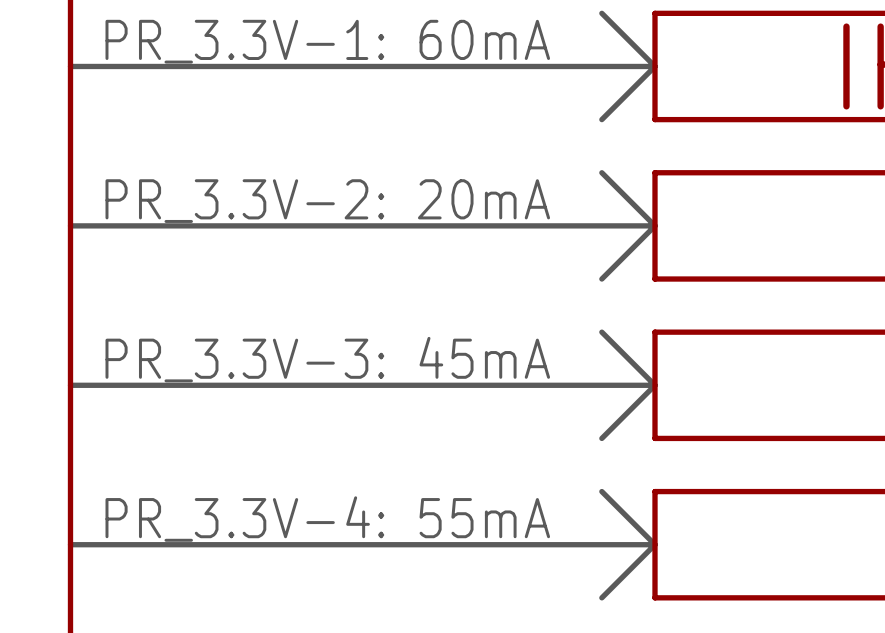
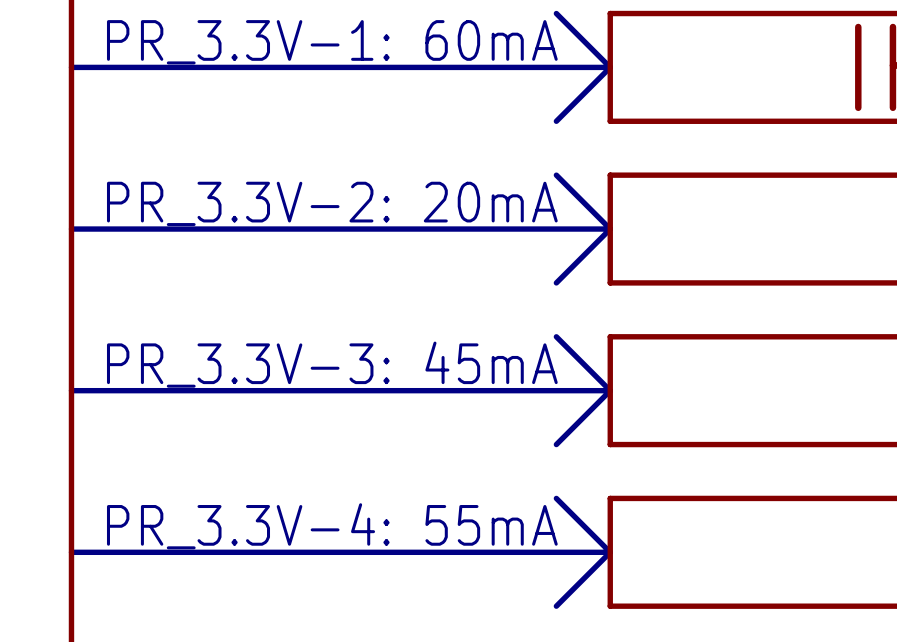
line: none -> (556, 13) (610, 67) (556, 121)
line: (601, 13) (654, 66) -> none
line: (654, 13) (654, 119) -> (664, 13) (610, 13) (610, 121) (664, 121)
line: (601, 66) (654, 66) -> none
line: (654, 66) (601, 119) -> none
line: none -> (556, 175) (610, 229) (556, 282)
line: (601, 172) (654, 225) -> none
line: (654, 172) (654, 279) -> (664, 175) (610, 175) (610, 282) (664, 282)
line: (601, 225) (654, 225) -> none
line: (654, 225) (601, 279) -> none
line: none -> (556, 336) (610, 390) (556, 444)
line: (601, 332) (654, 385) -> none
line: (654, 332) (654, 438) -> (664, 336) (610, 336) (610, 444) (664, 444)
line: (601, 385) (654, 385) -> none
line: (654, 385) (601, 438) -> none
line: none -> (556, 498) (610, 552) (556, 606)
line: (601, 491) (654, 544) -> none
line: (654, 491) (654, 597) -> (664, 498) (610, 498) (610, 606) (664, 606)
line: (601, 544) (654, 544) -> none
line: (654, 544) (601, 597) -> none

